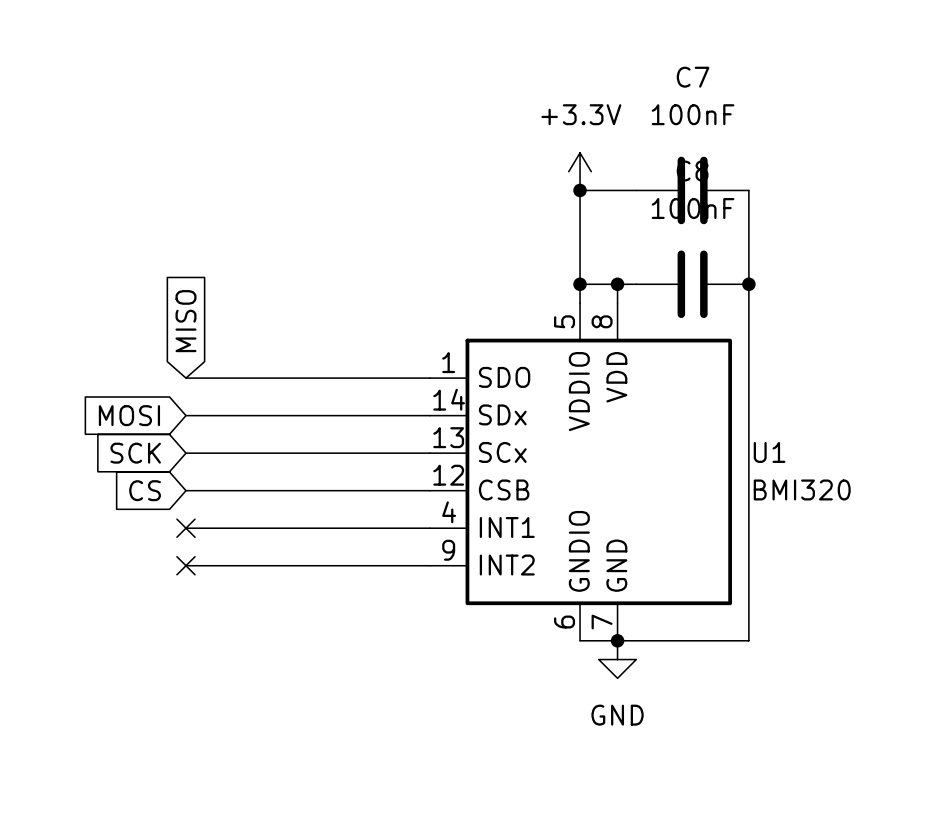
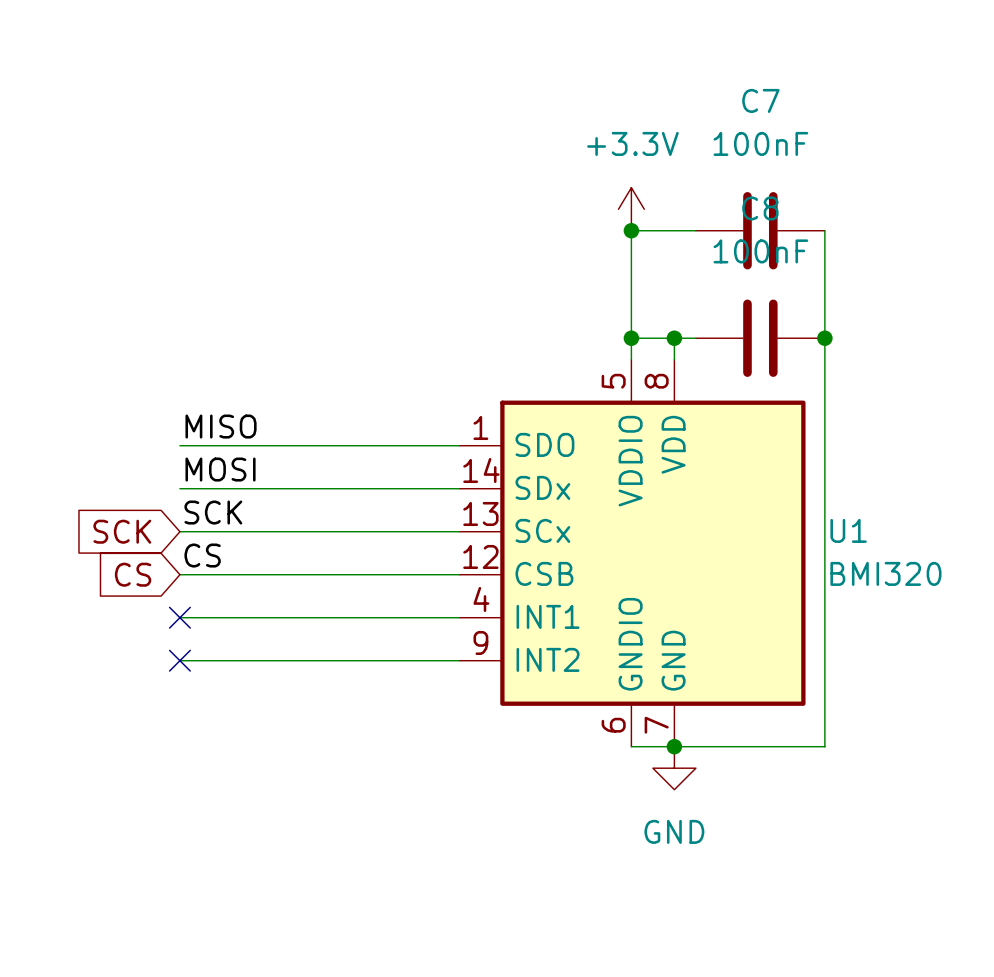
global label: MISO (185, 321) -> none
label: none -> MISO (221, 426)
label: none -> MOSI (220, 469)
global label: MOSI (129, 415) -> none
label: none -> SCK (213, 512)
label: none -> CS (202, 555)

